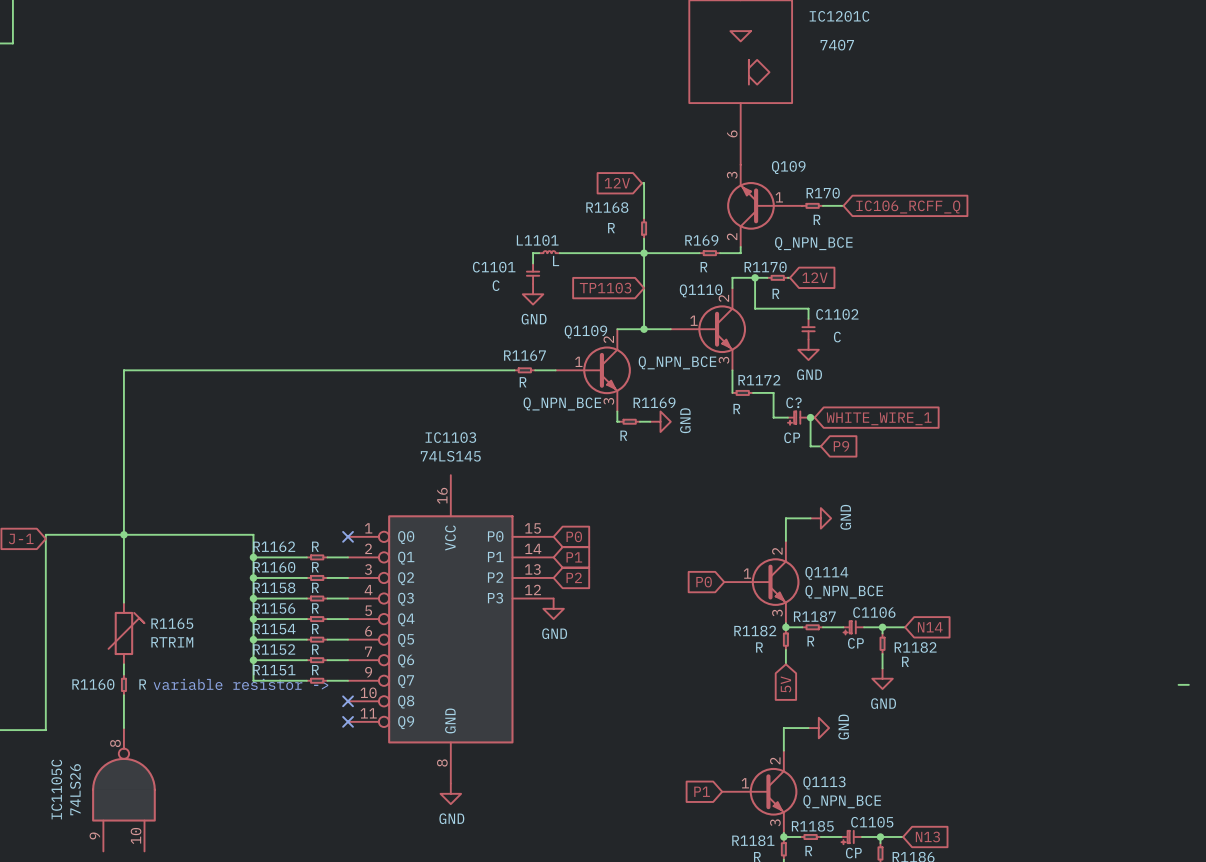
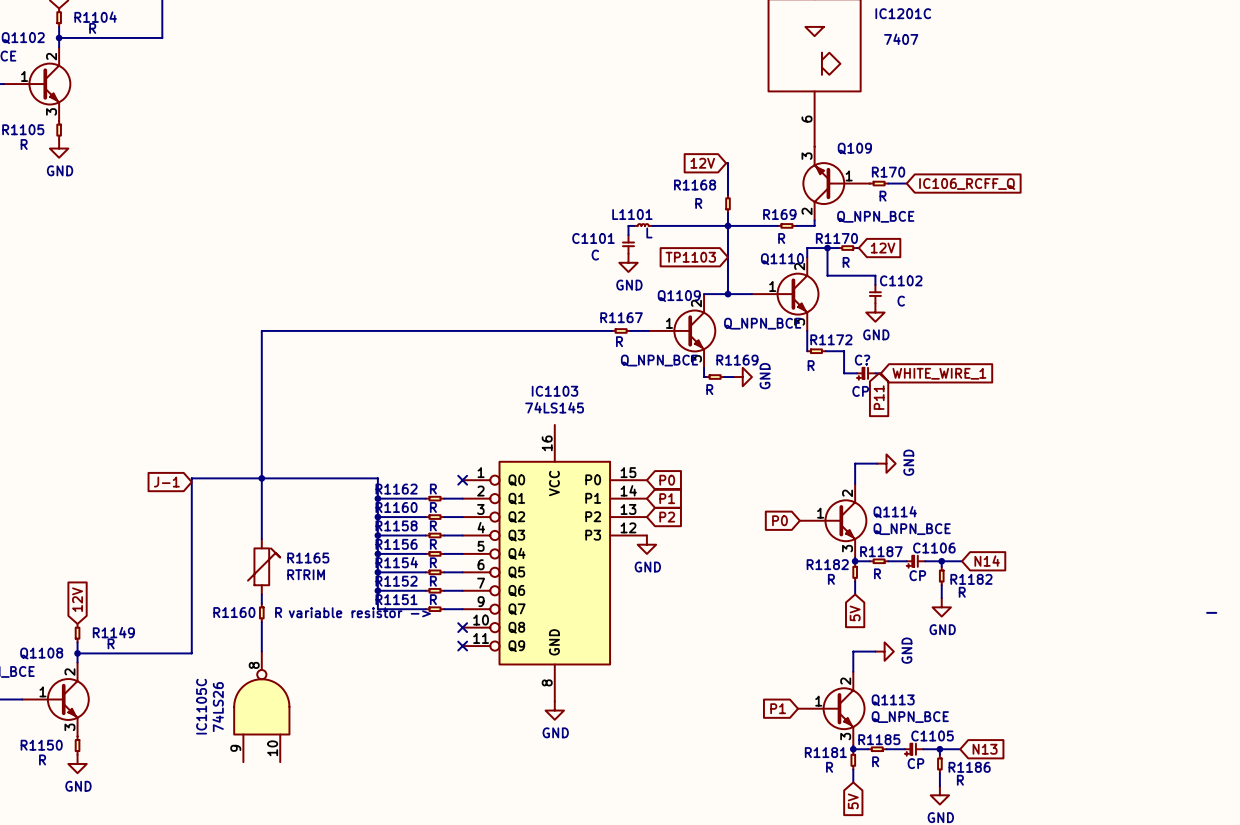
wire: (810, 417) (810, 446) (820, 446) -> none
junction: (810, 417) -> none
global label: none -> P11 (879, 397)
global label: P9 (841, 446) -> none

